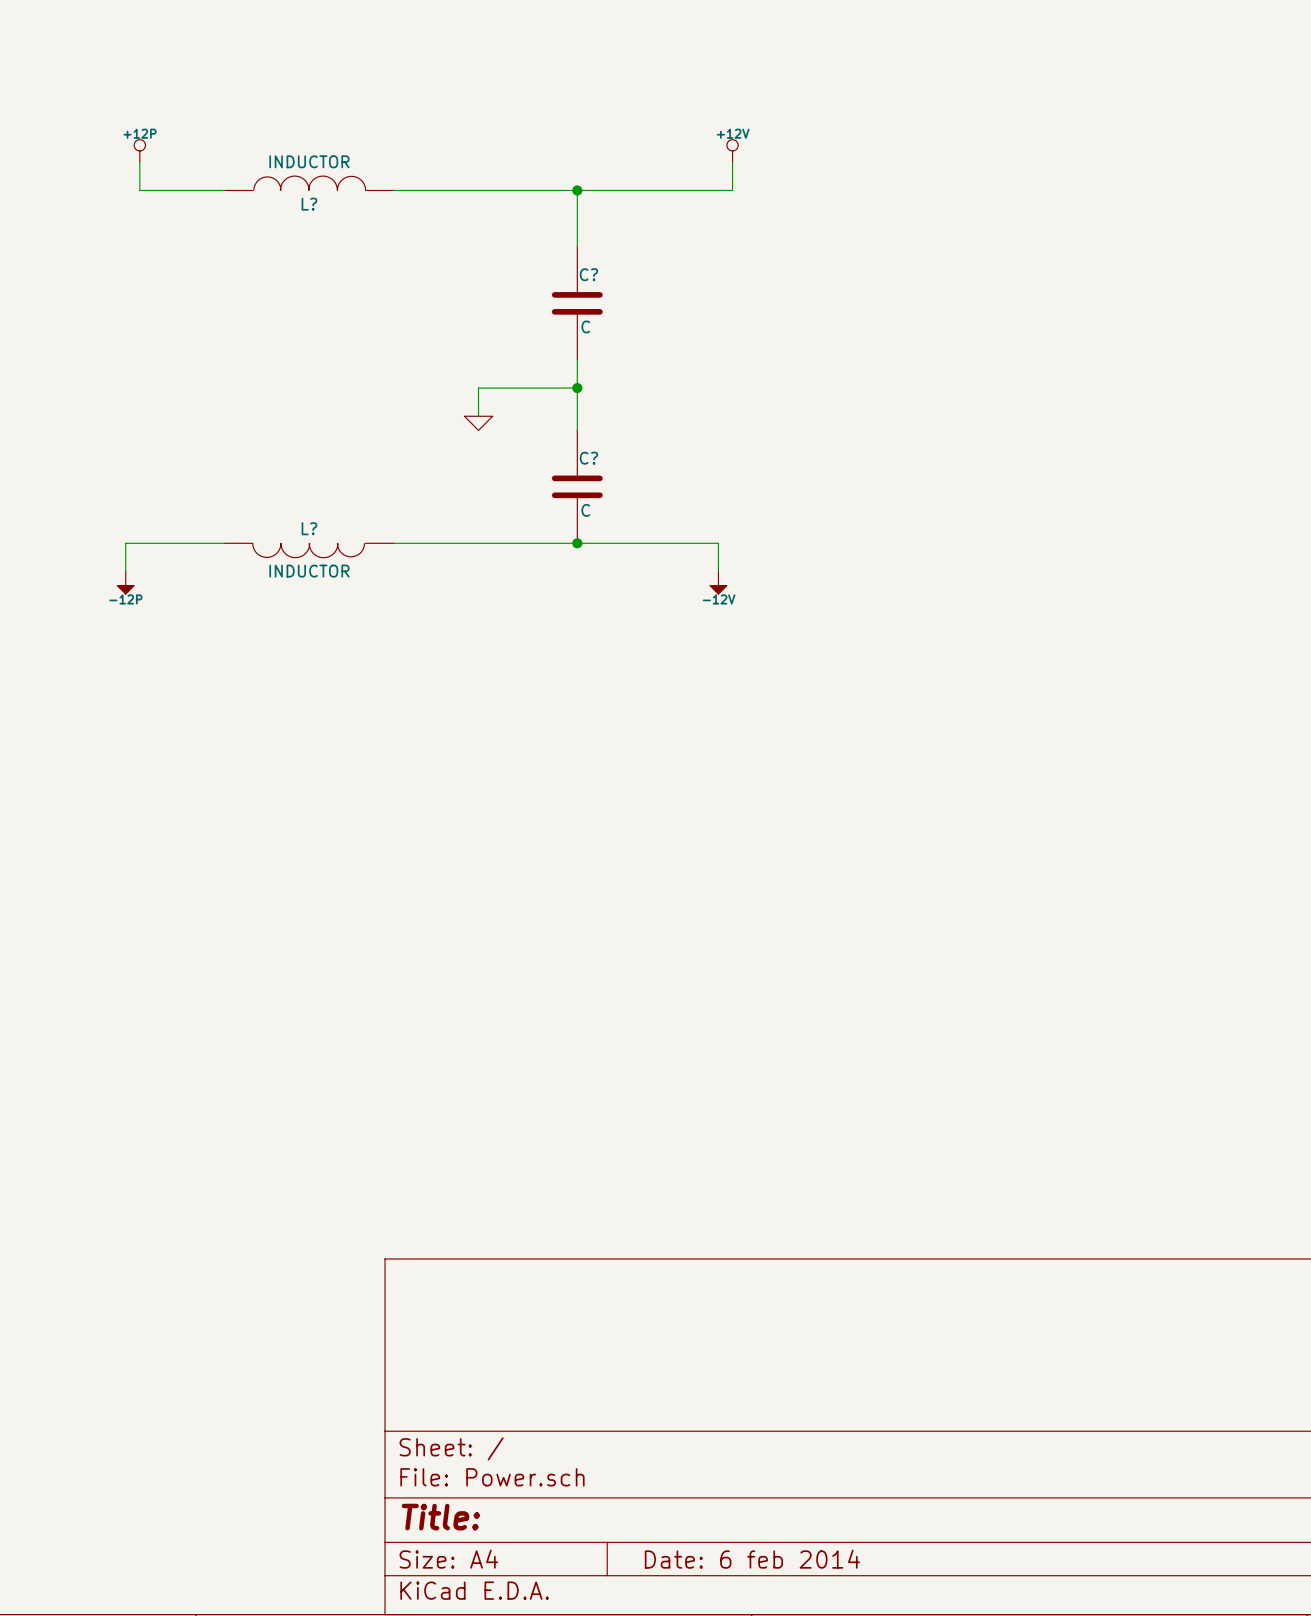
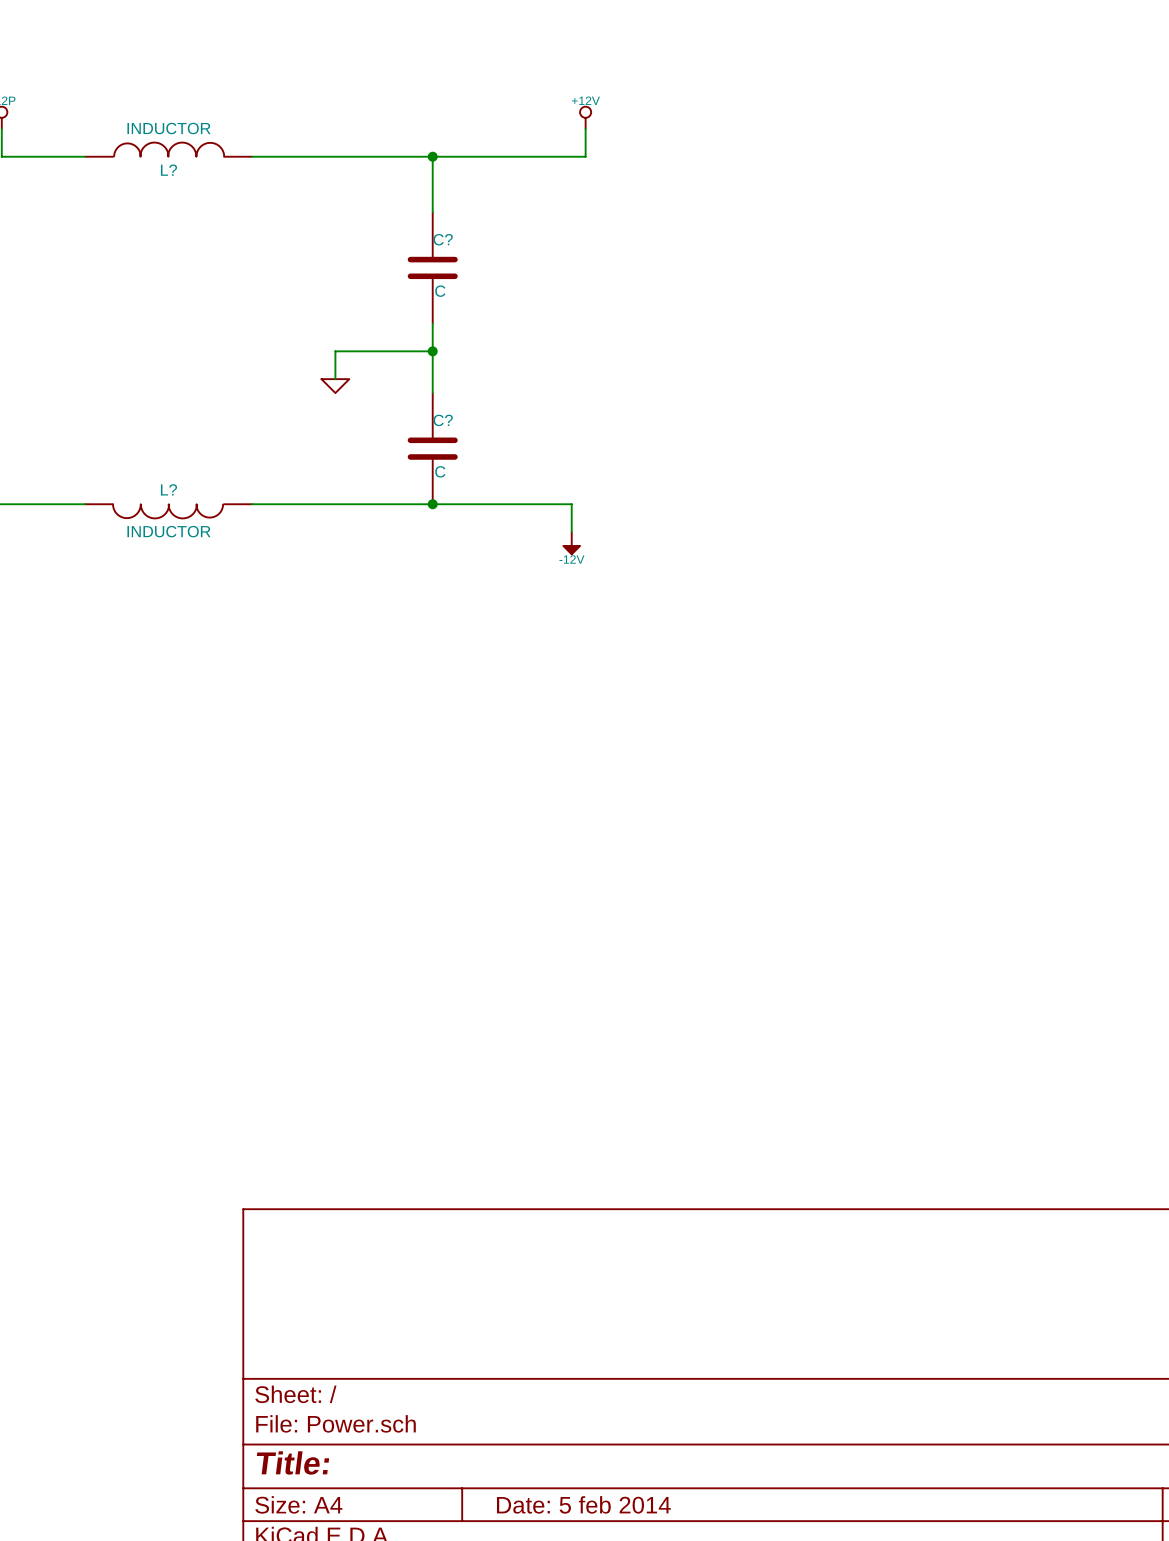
title block: Date: 6 feb 2014 (752, 1559) -> Date: 5 feb 2014 (583, 1504)

